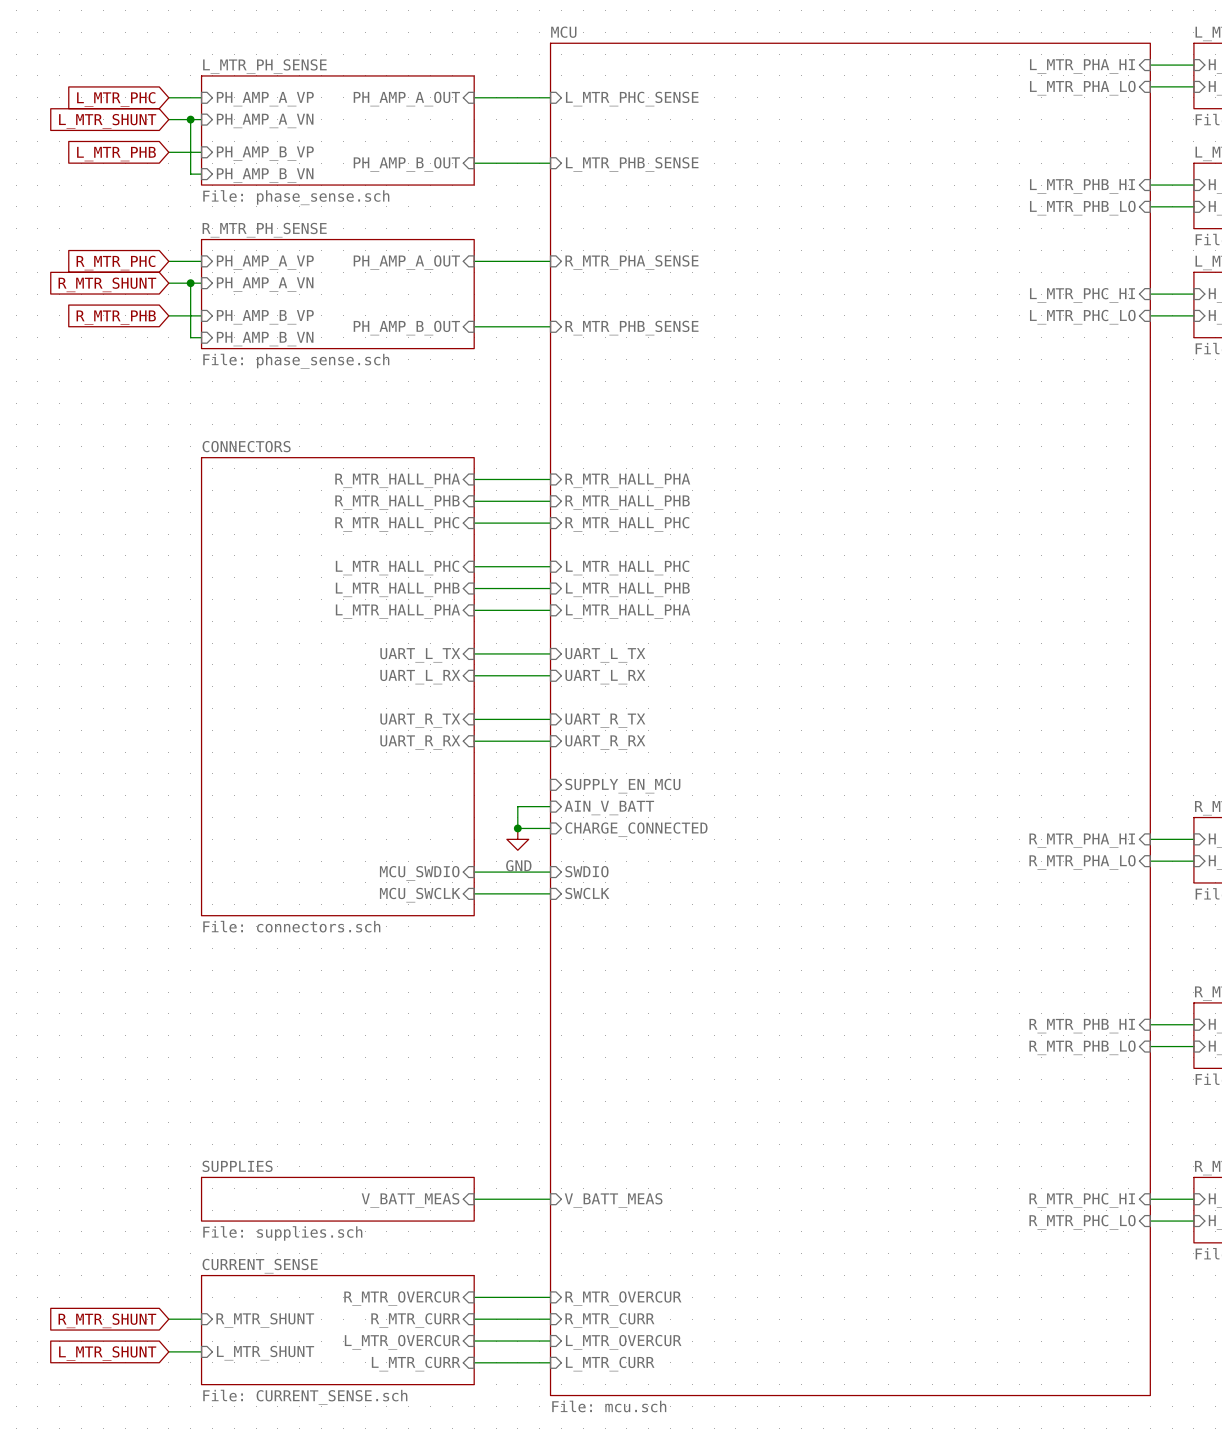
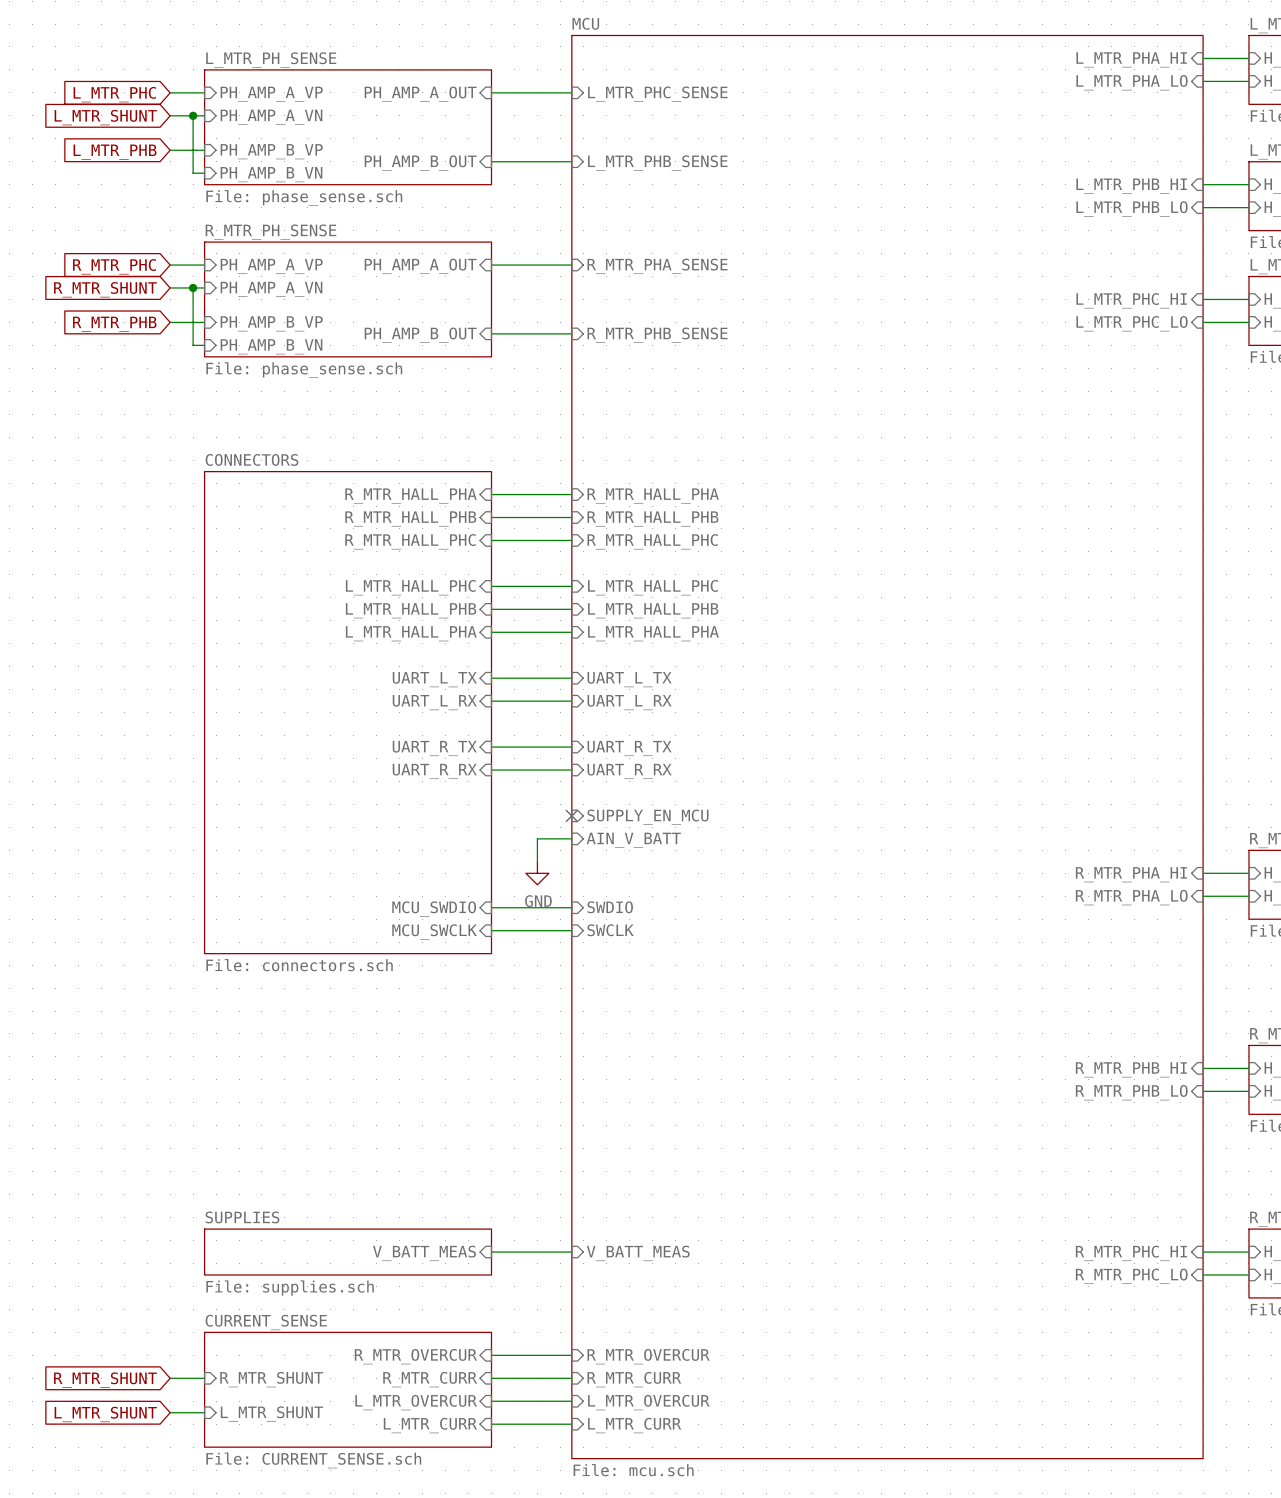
no-connect mark: none -> (571, 815)
wire: (517, 828) (550, 828) -> none
junction: (517, 828) -> none
sheet pin: CHARGE_CONNECTED (636, 829) -> none

